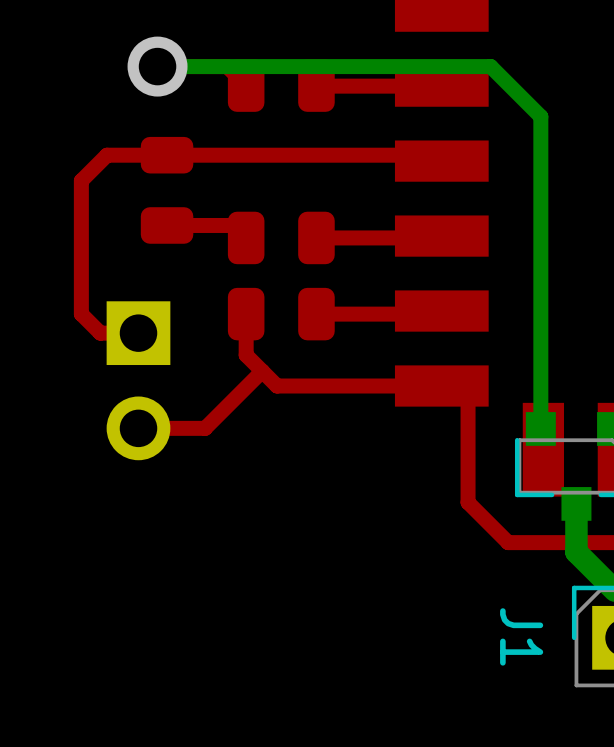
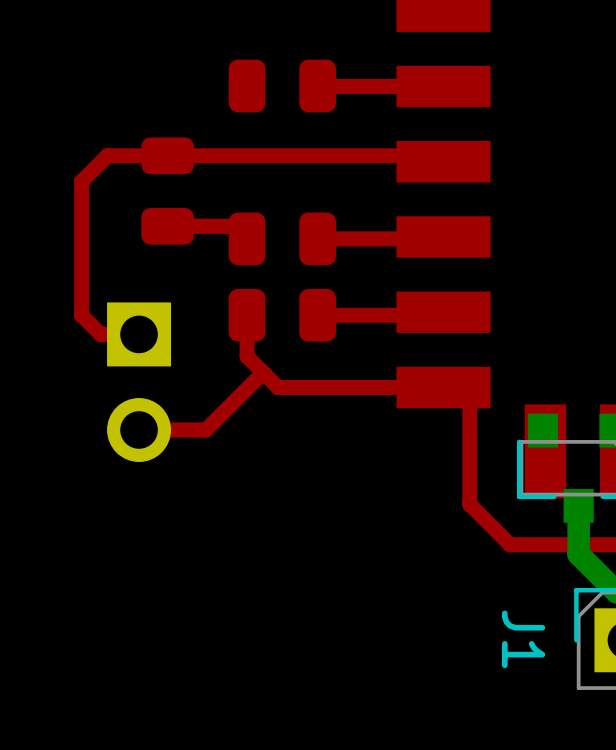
bottom track: (157, 66) (490, 66) (540, 116) (540, 428) -> none
via: (157, 66) -> none

